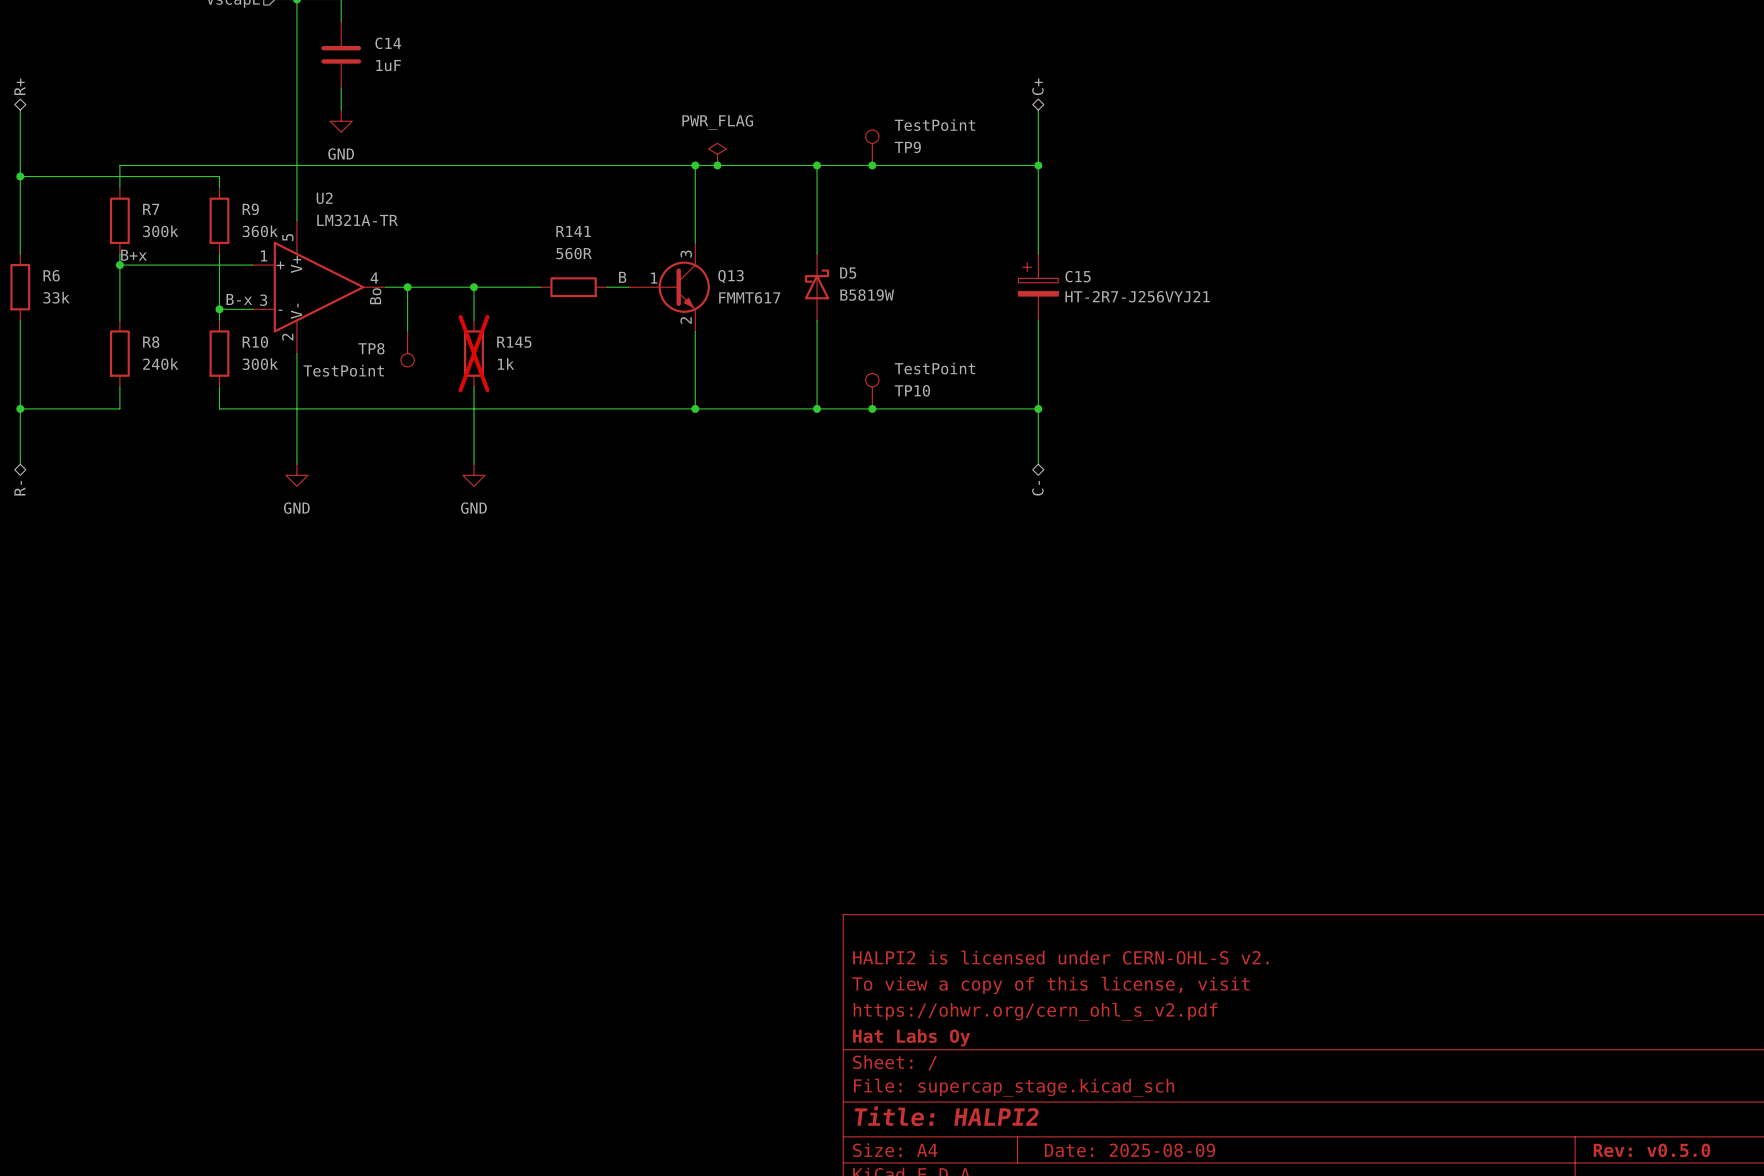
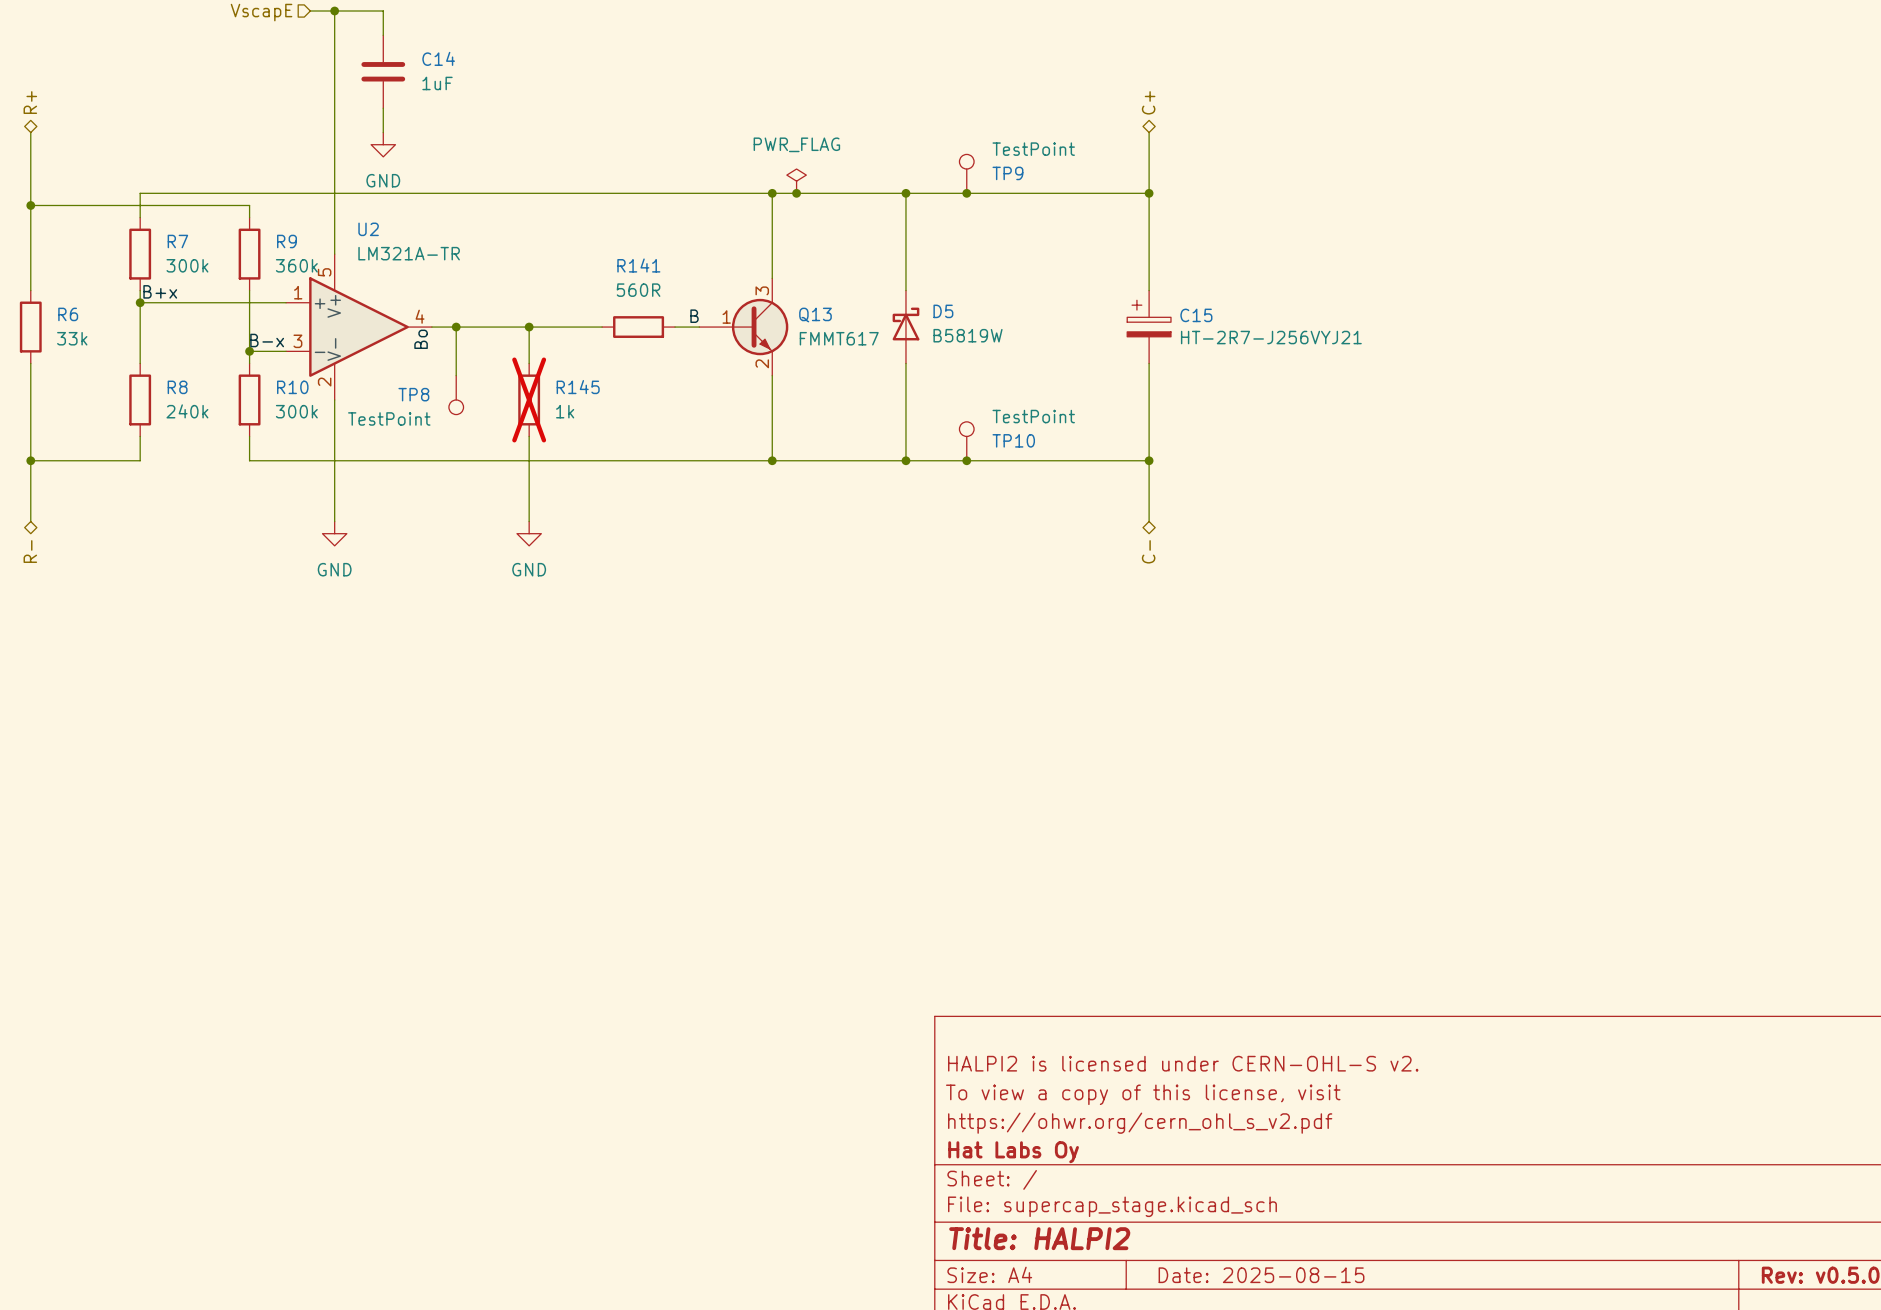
title block: Date: 2025-08-09 (1129, 1150) -> Date: 2025-08-15 (1261, 1275)

